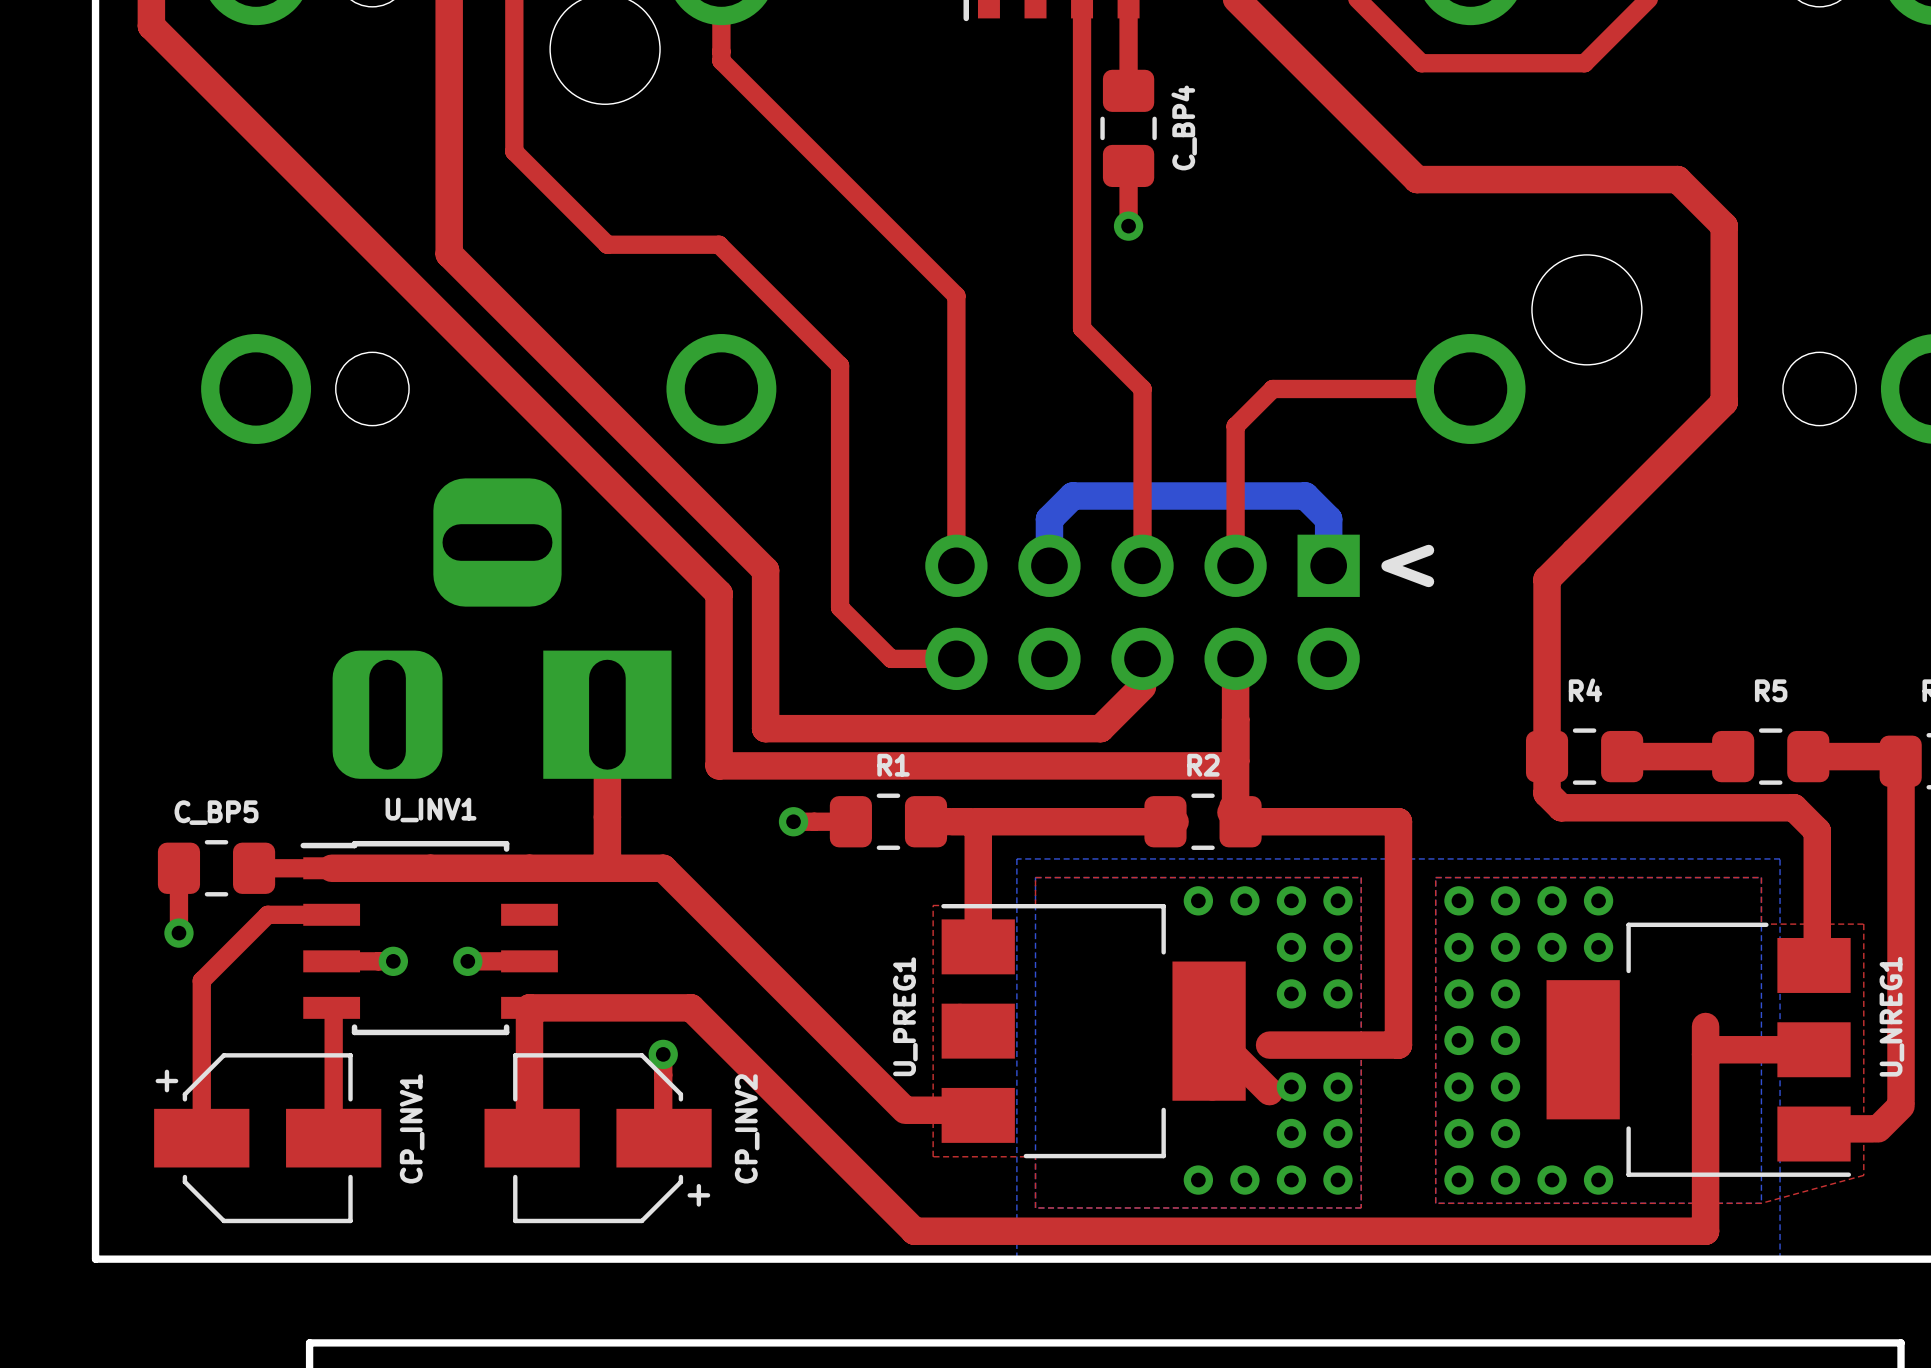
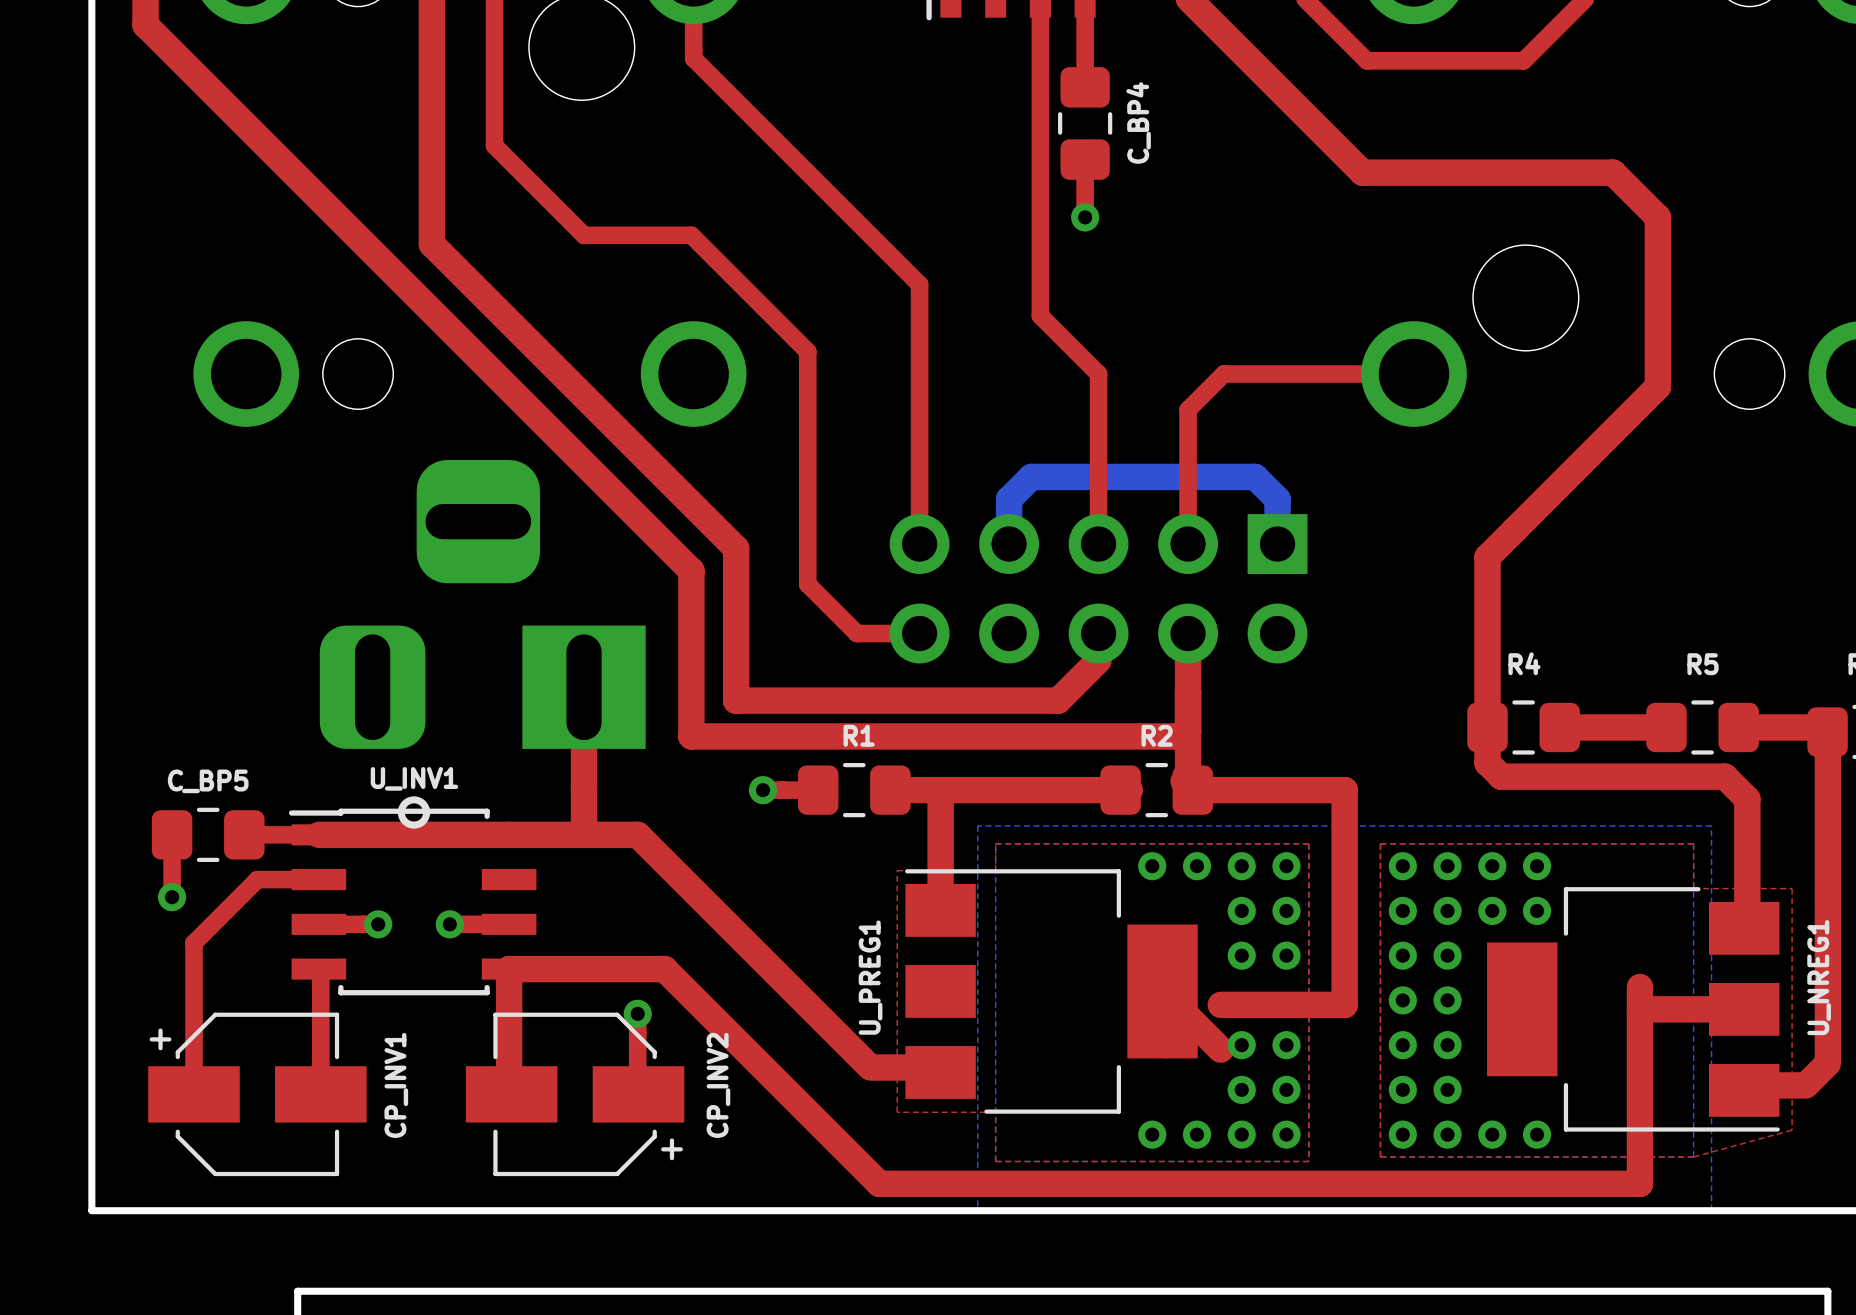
text: > (1407, 565) -> none
drawing: none -> [397, 796, 431, 829]

